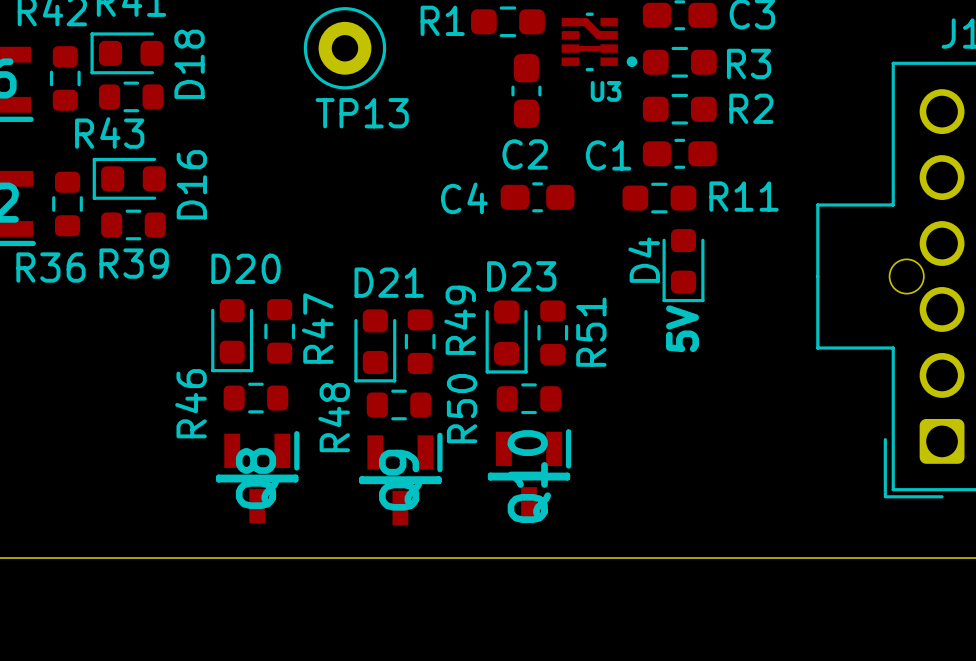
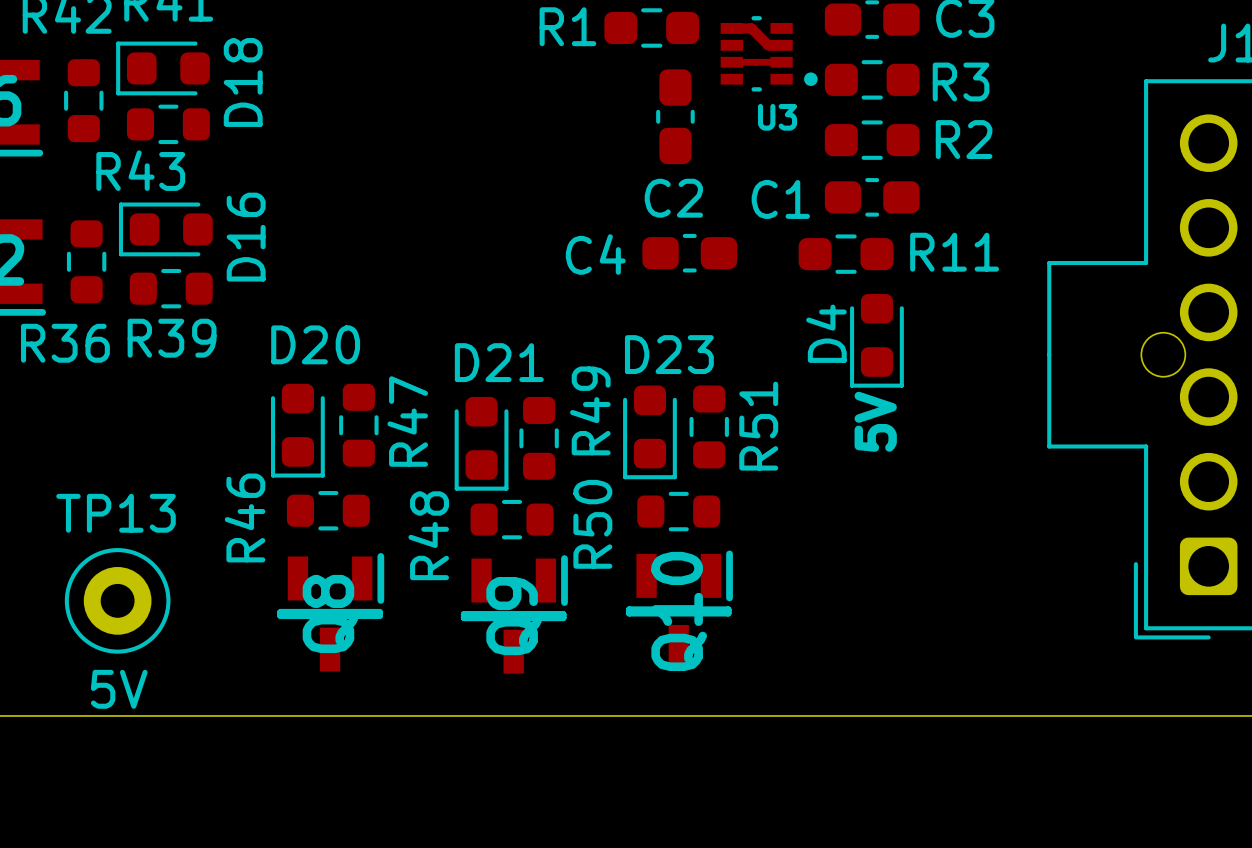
TP13 position: (344, 48) -> (117, 600)
TP13 name position: TP13 (362, 113) -> TP13 (116, 513)
TP13 value: none -> 5V (119, 689)

